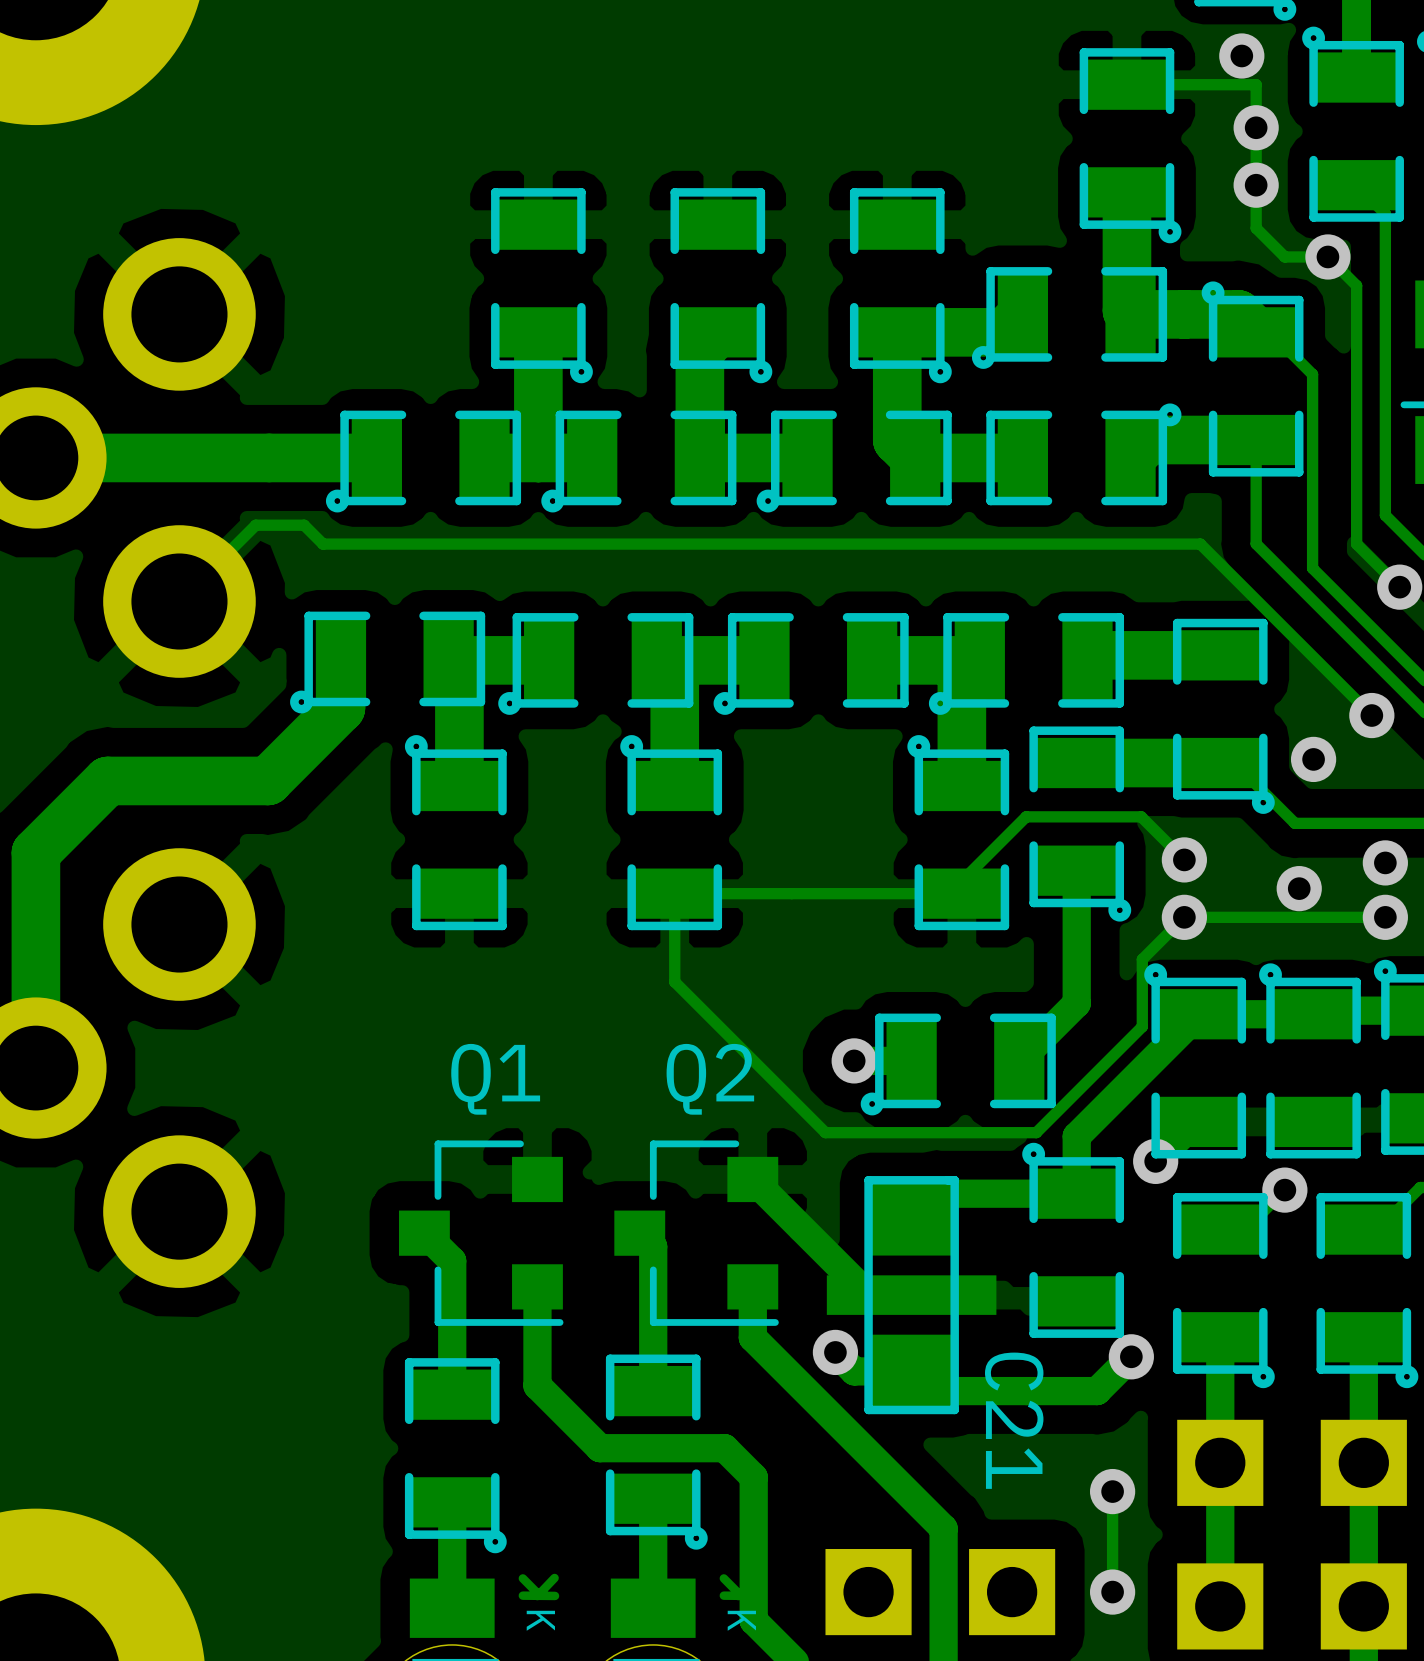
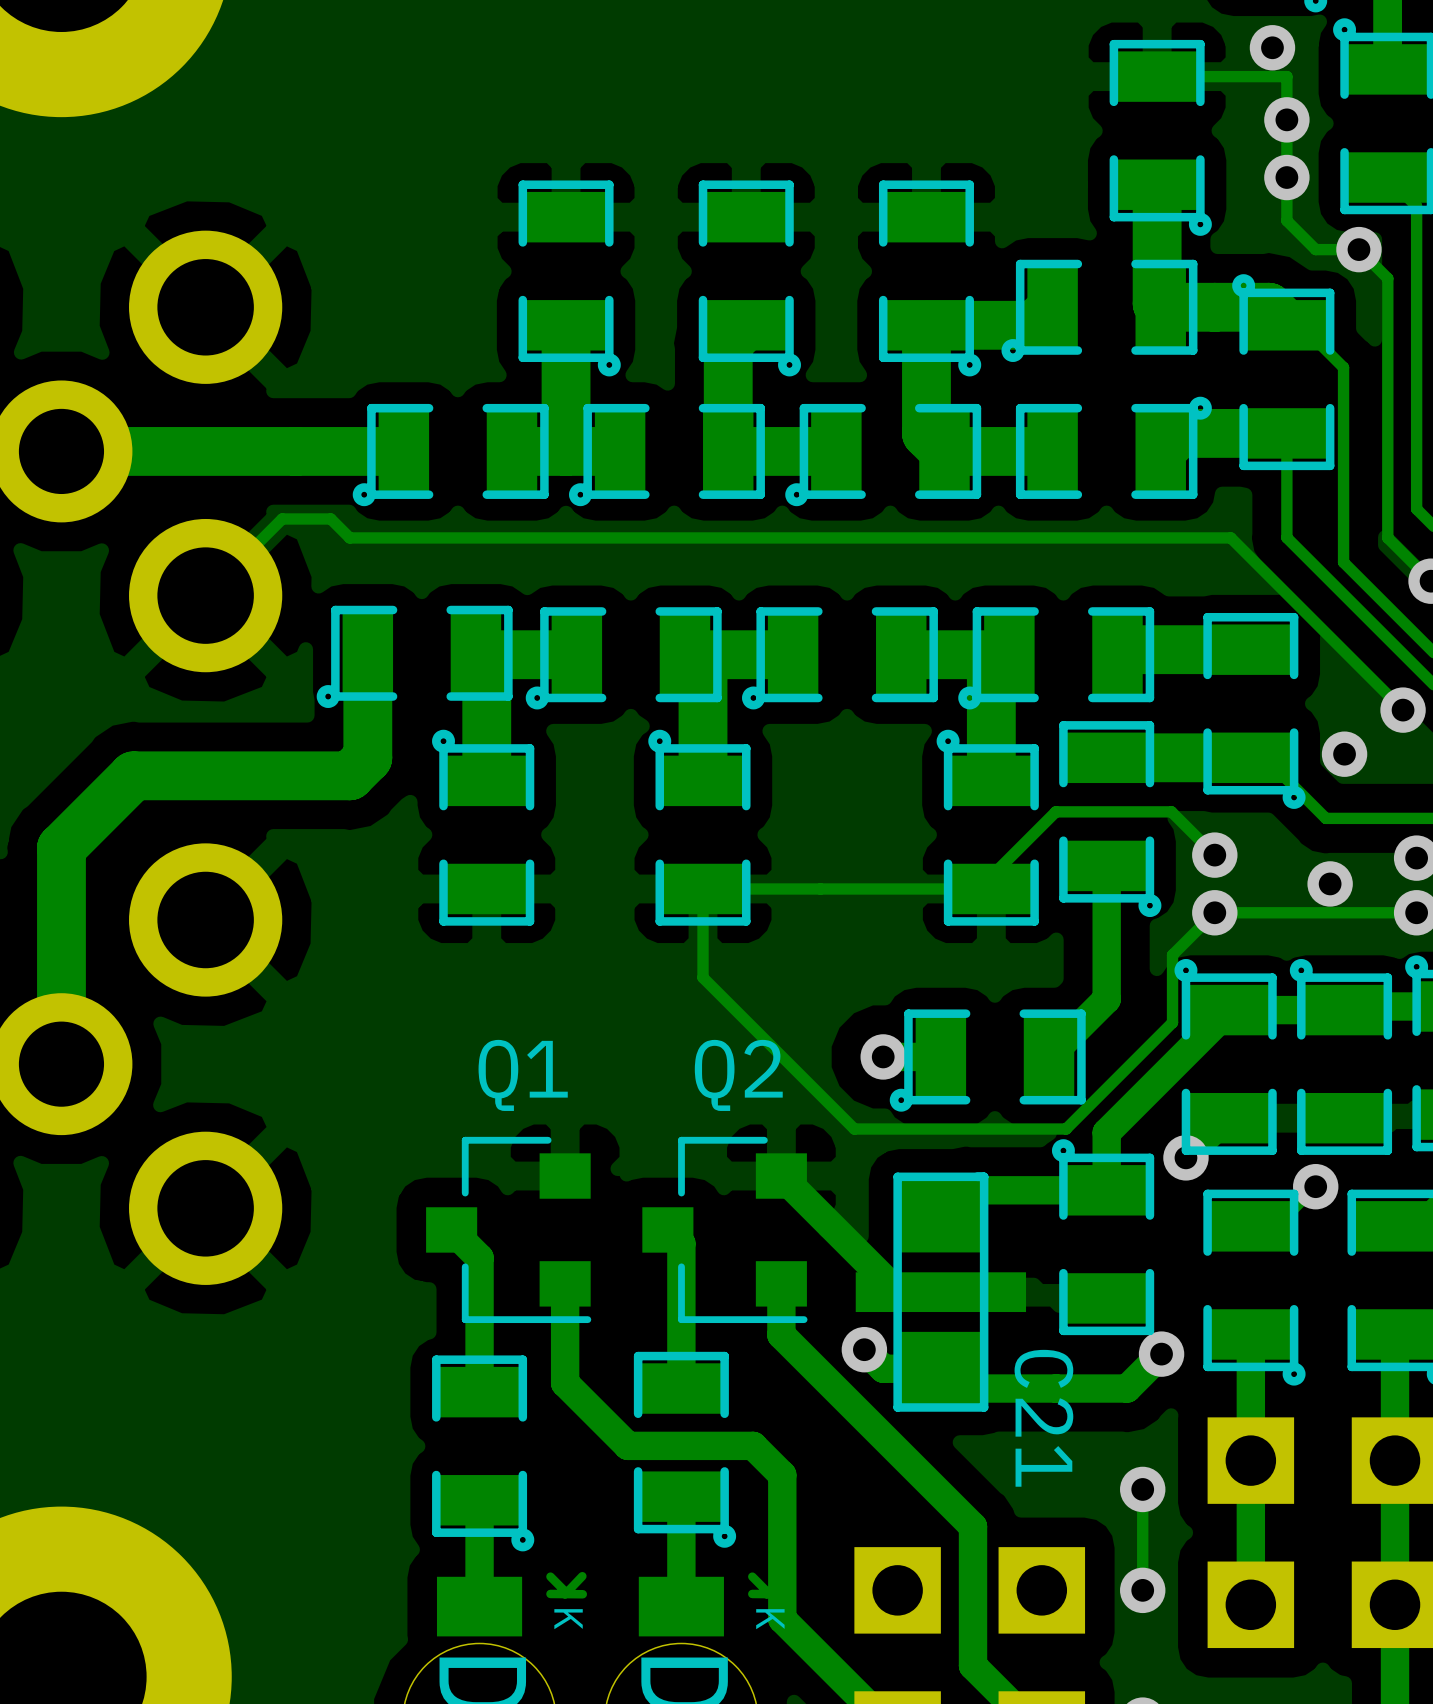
track: (340, 707) (267, 780) -> (367, 702) (367, 757) (349, 775) (294, 775)

